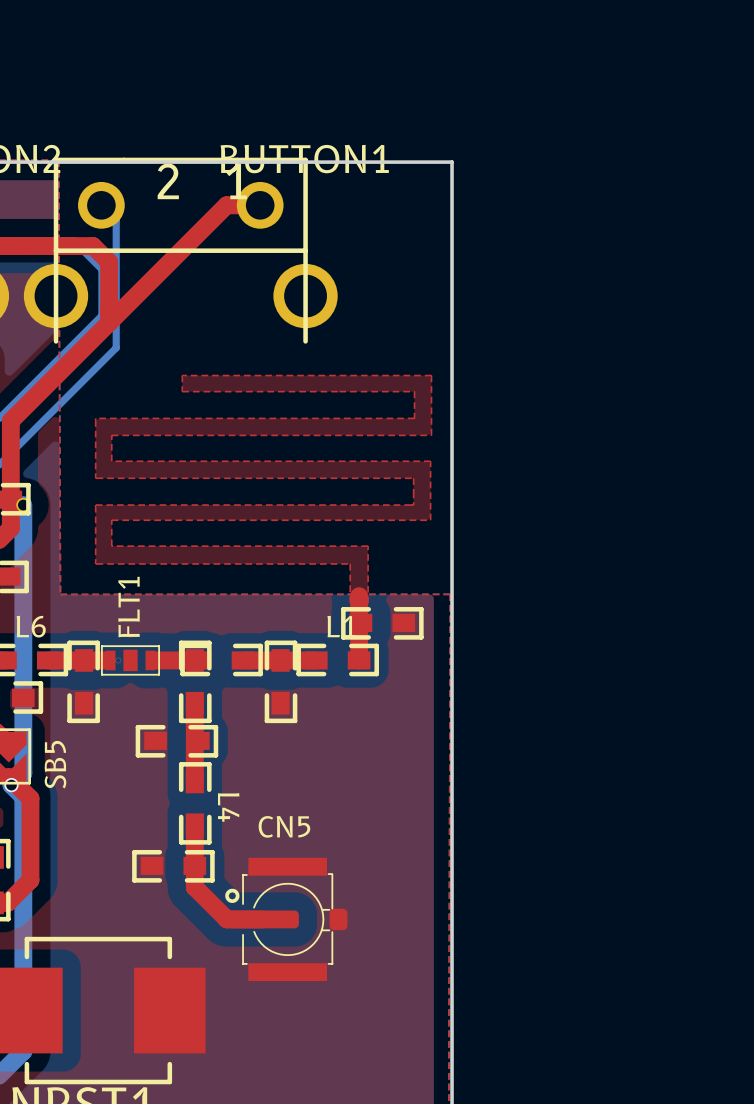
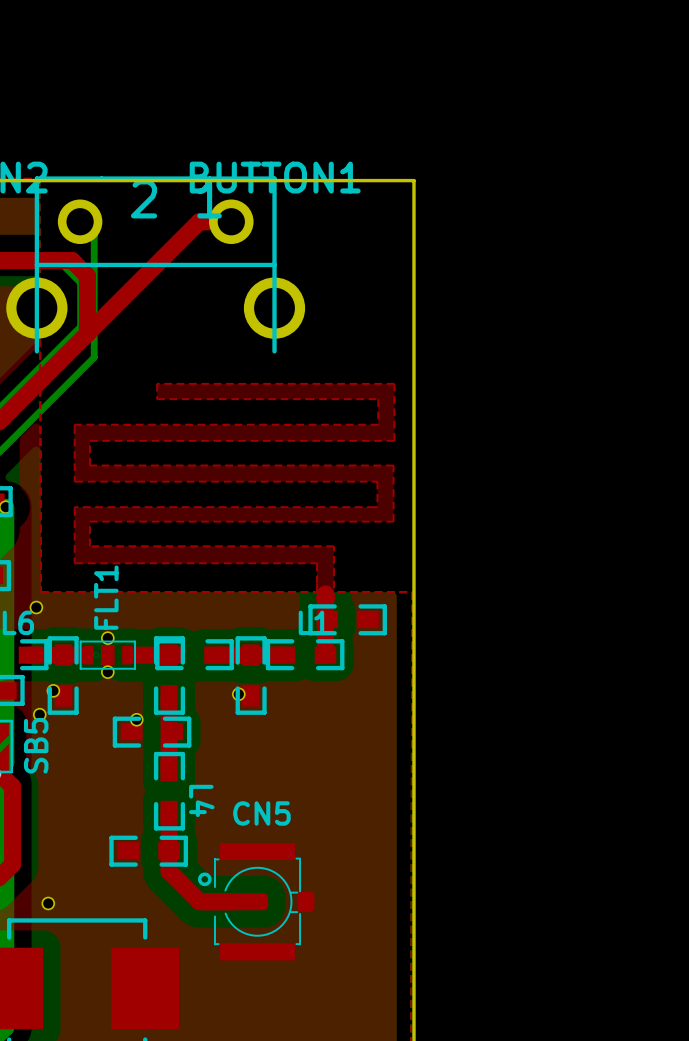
part: none -> (36, 607)
part: none -> (107, 638)
part: none -> (107, 672)
part: none -> (53, 690)
part: none -> (238, 694)
part: none -> (39, 714)
part: none -> (136, 719)
part: none -> (48, 903)

